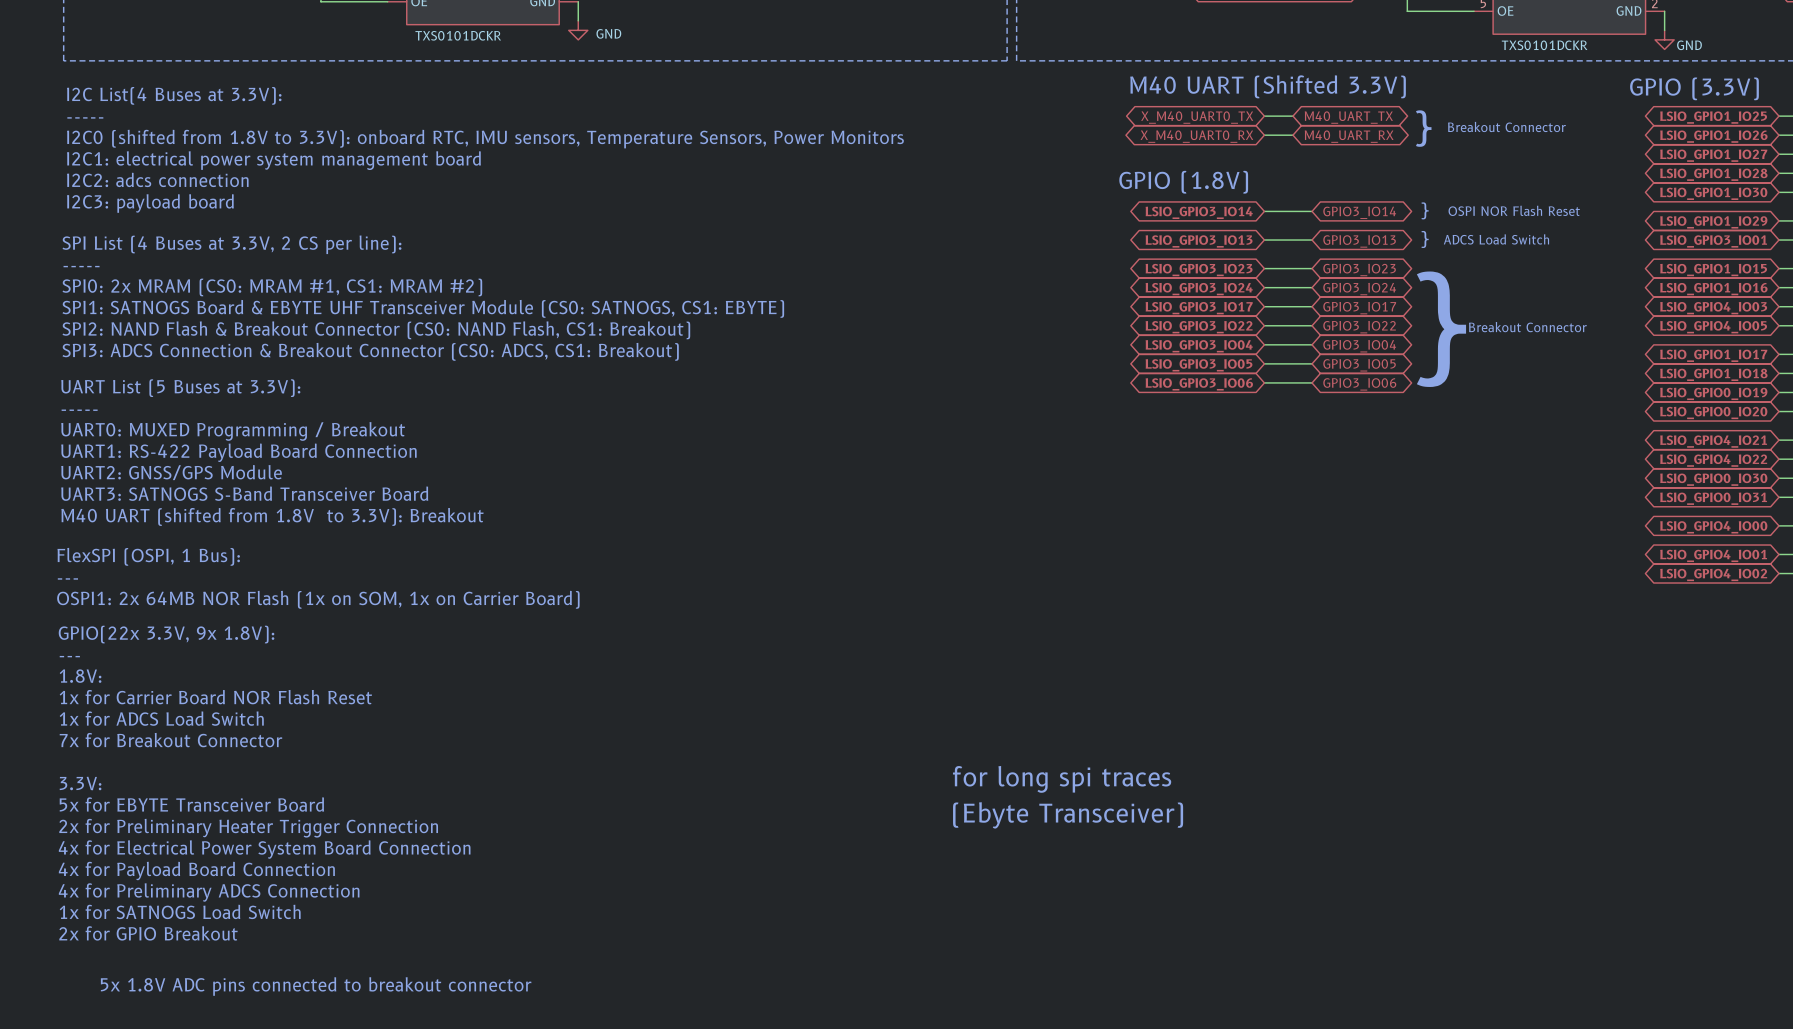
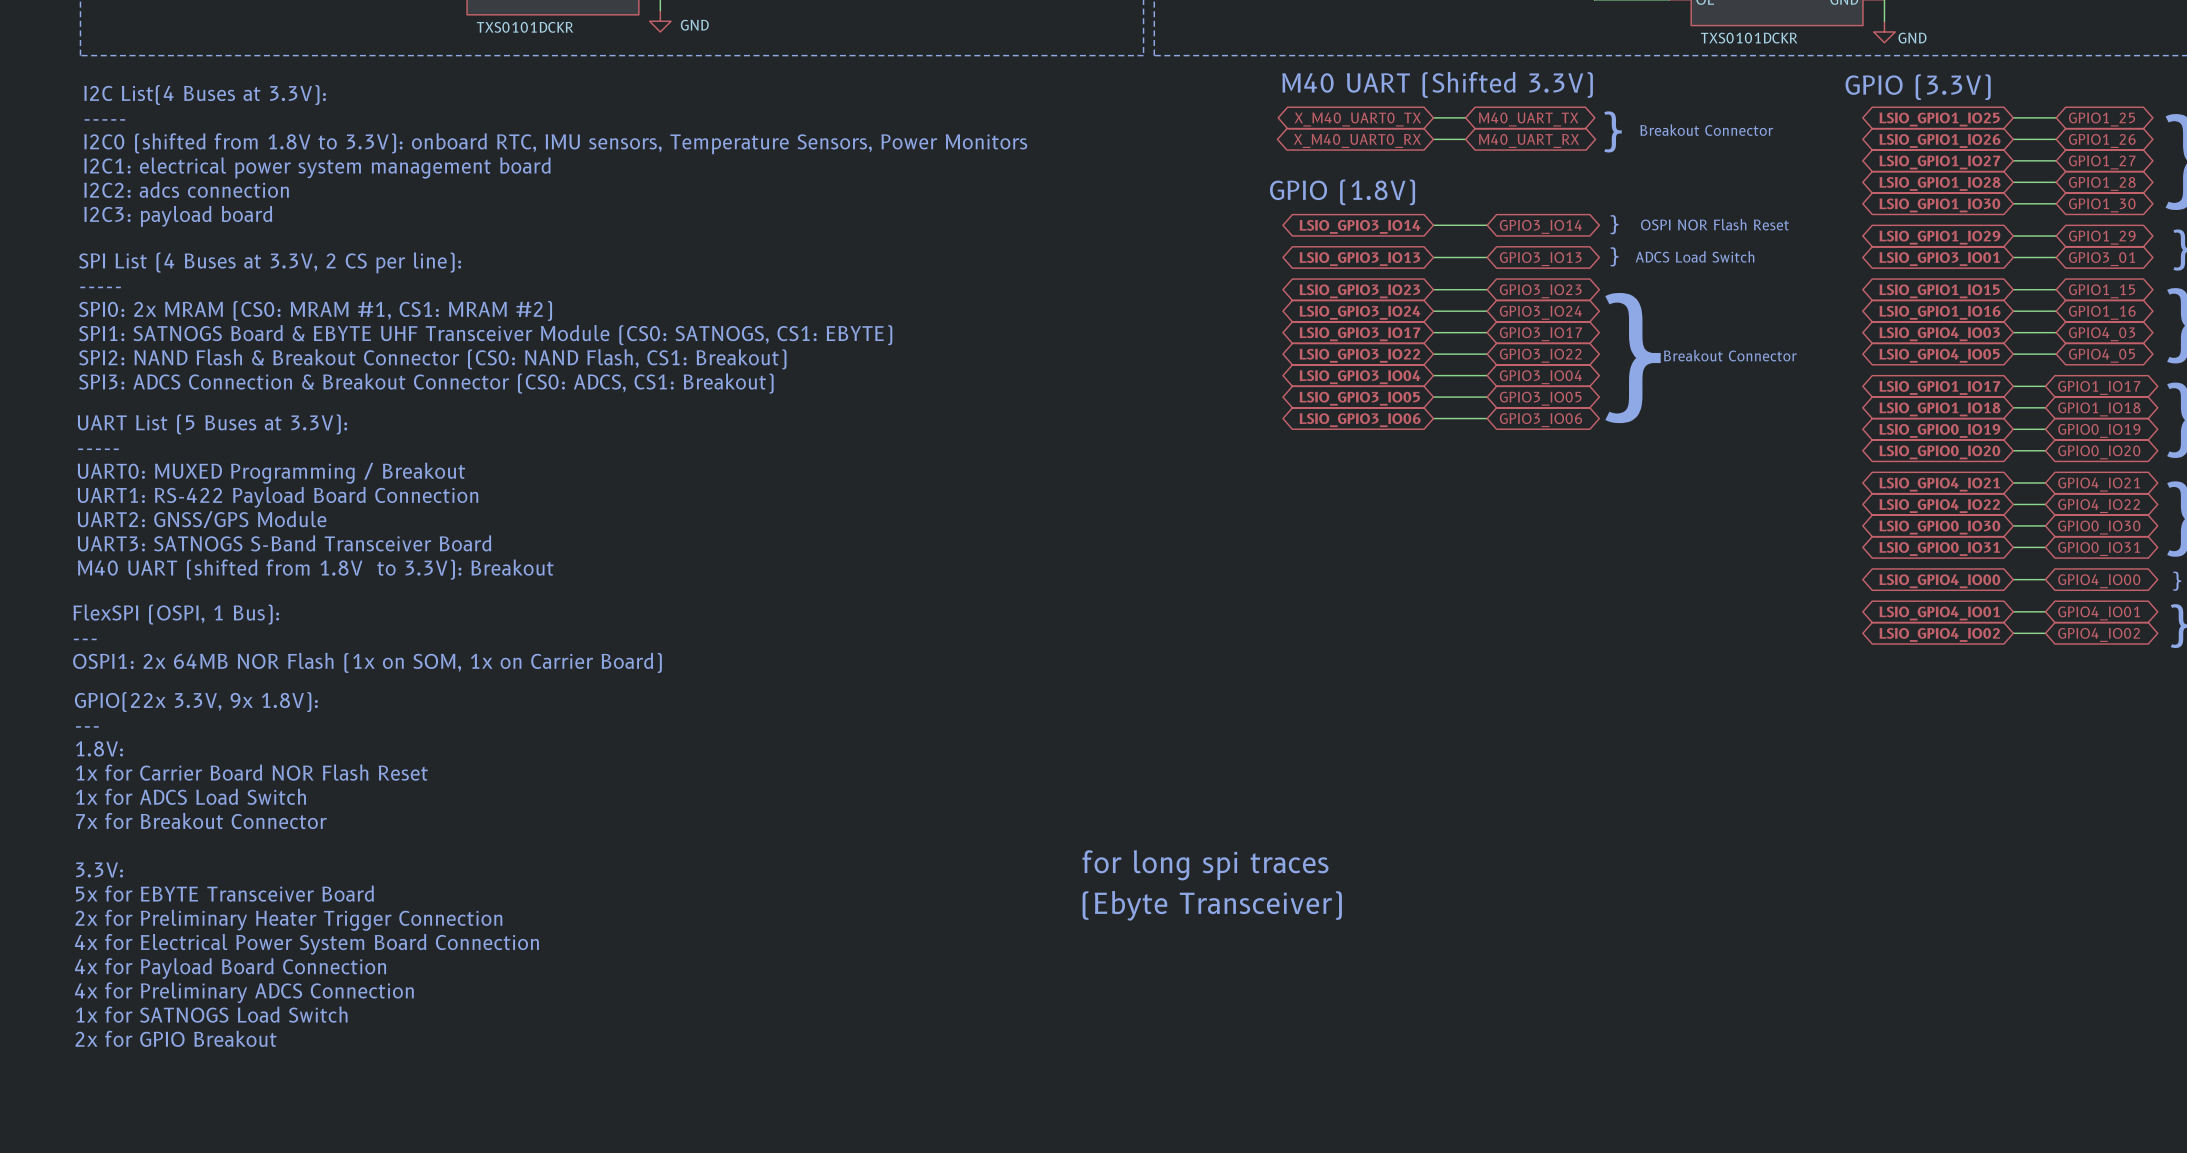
text: 5x 1.8V ADC pins connected to breakout connector (316, 986) -> none

